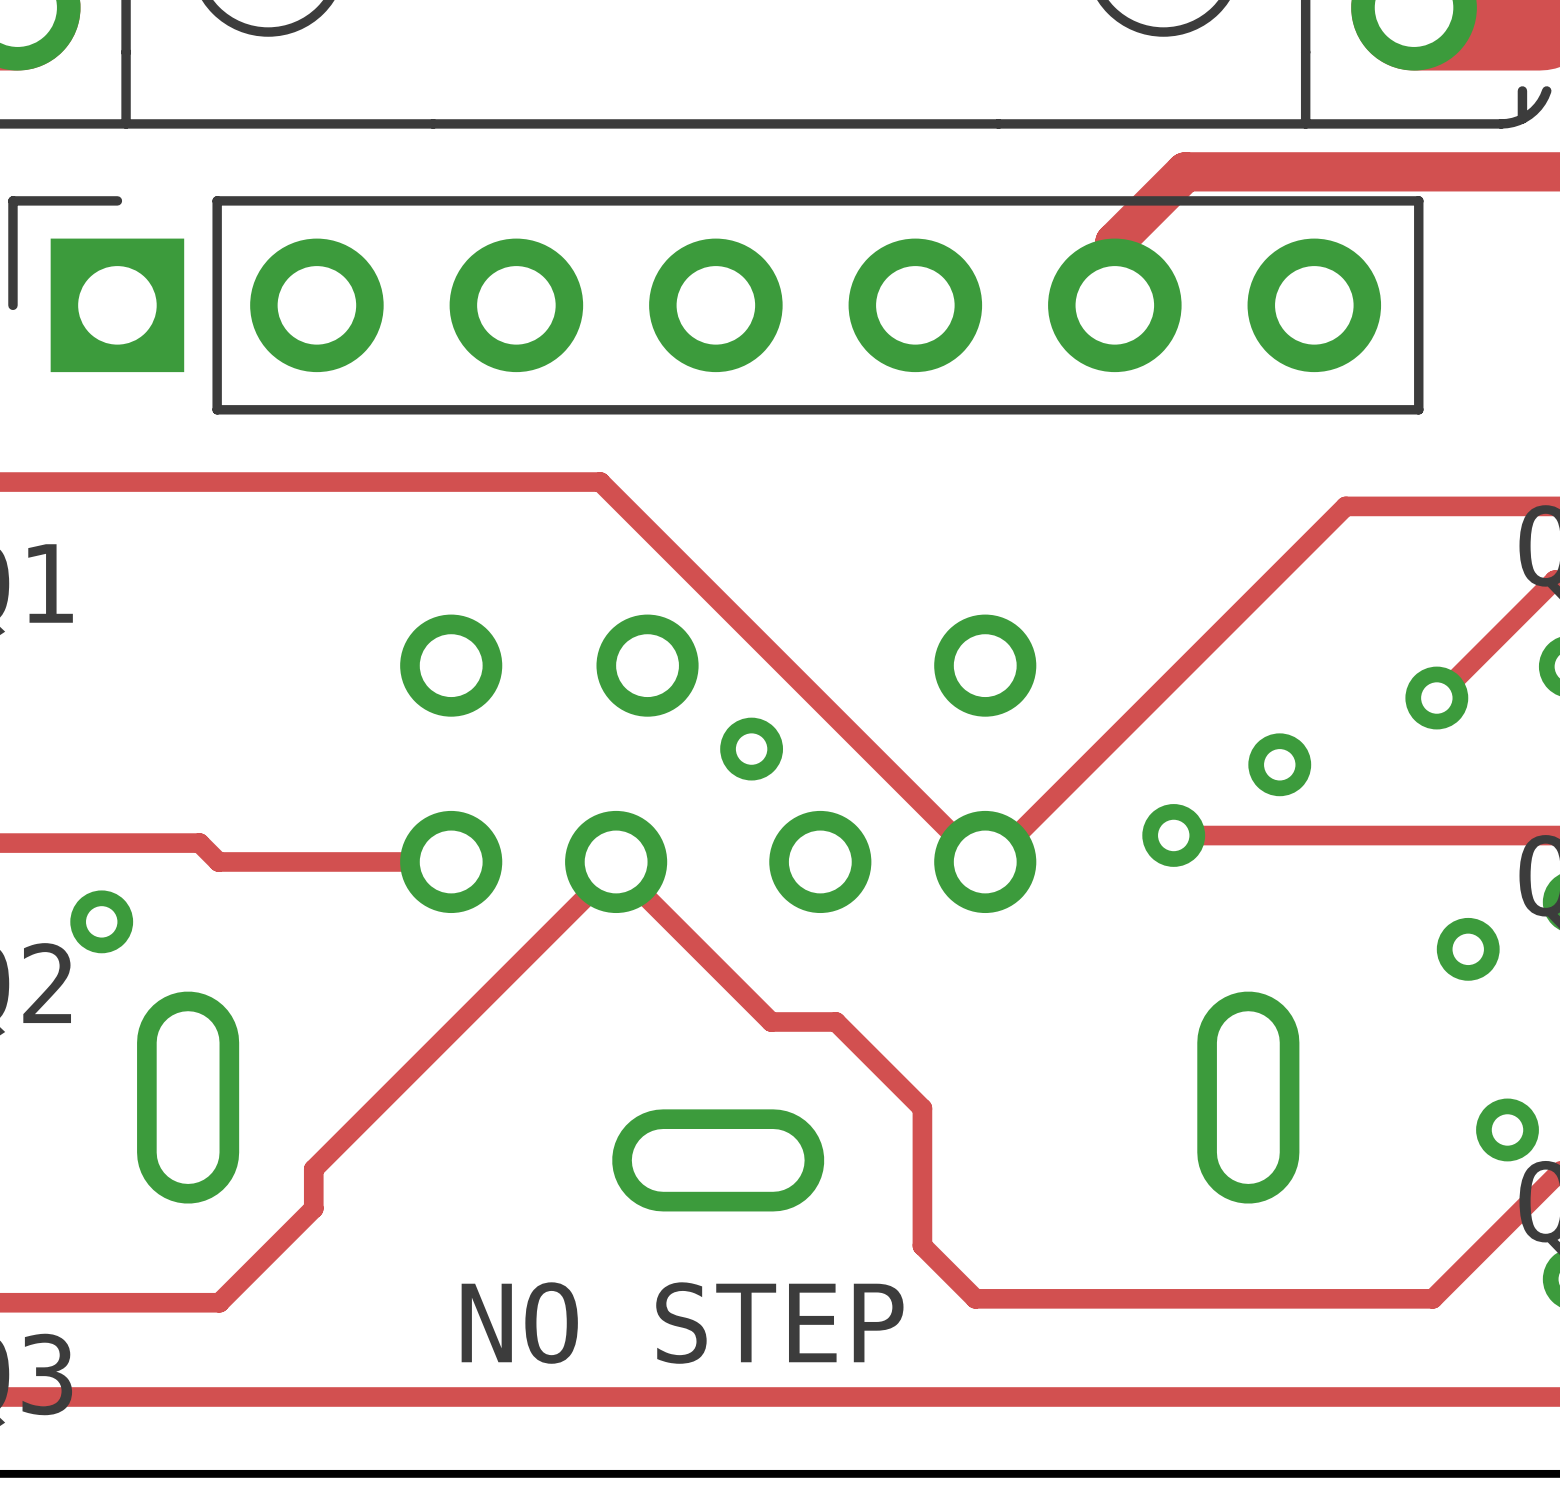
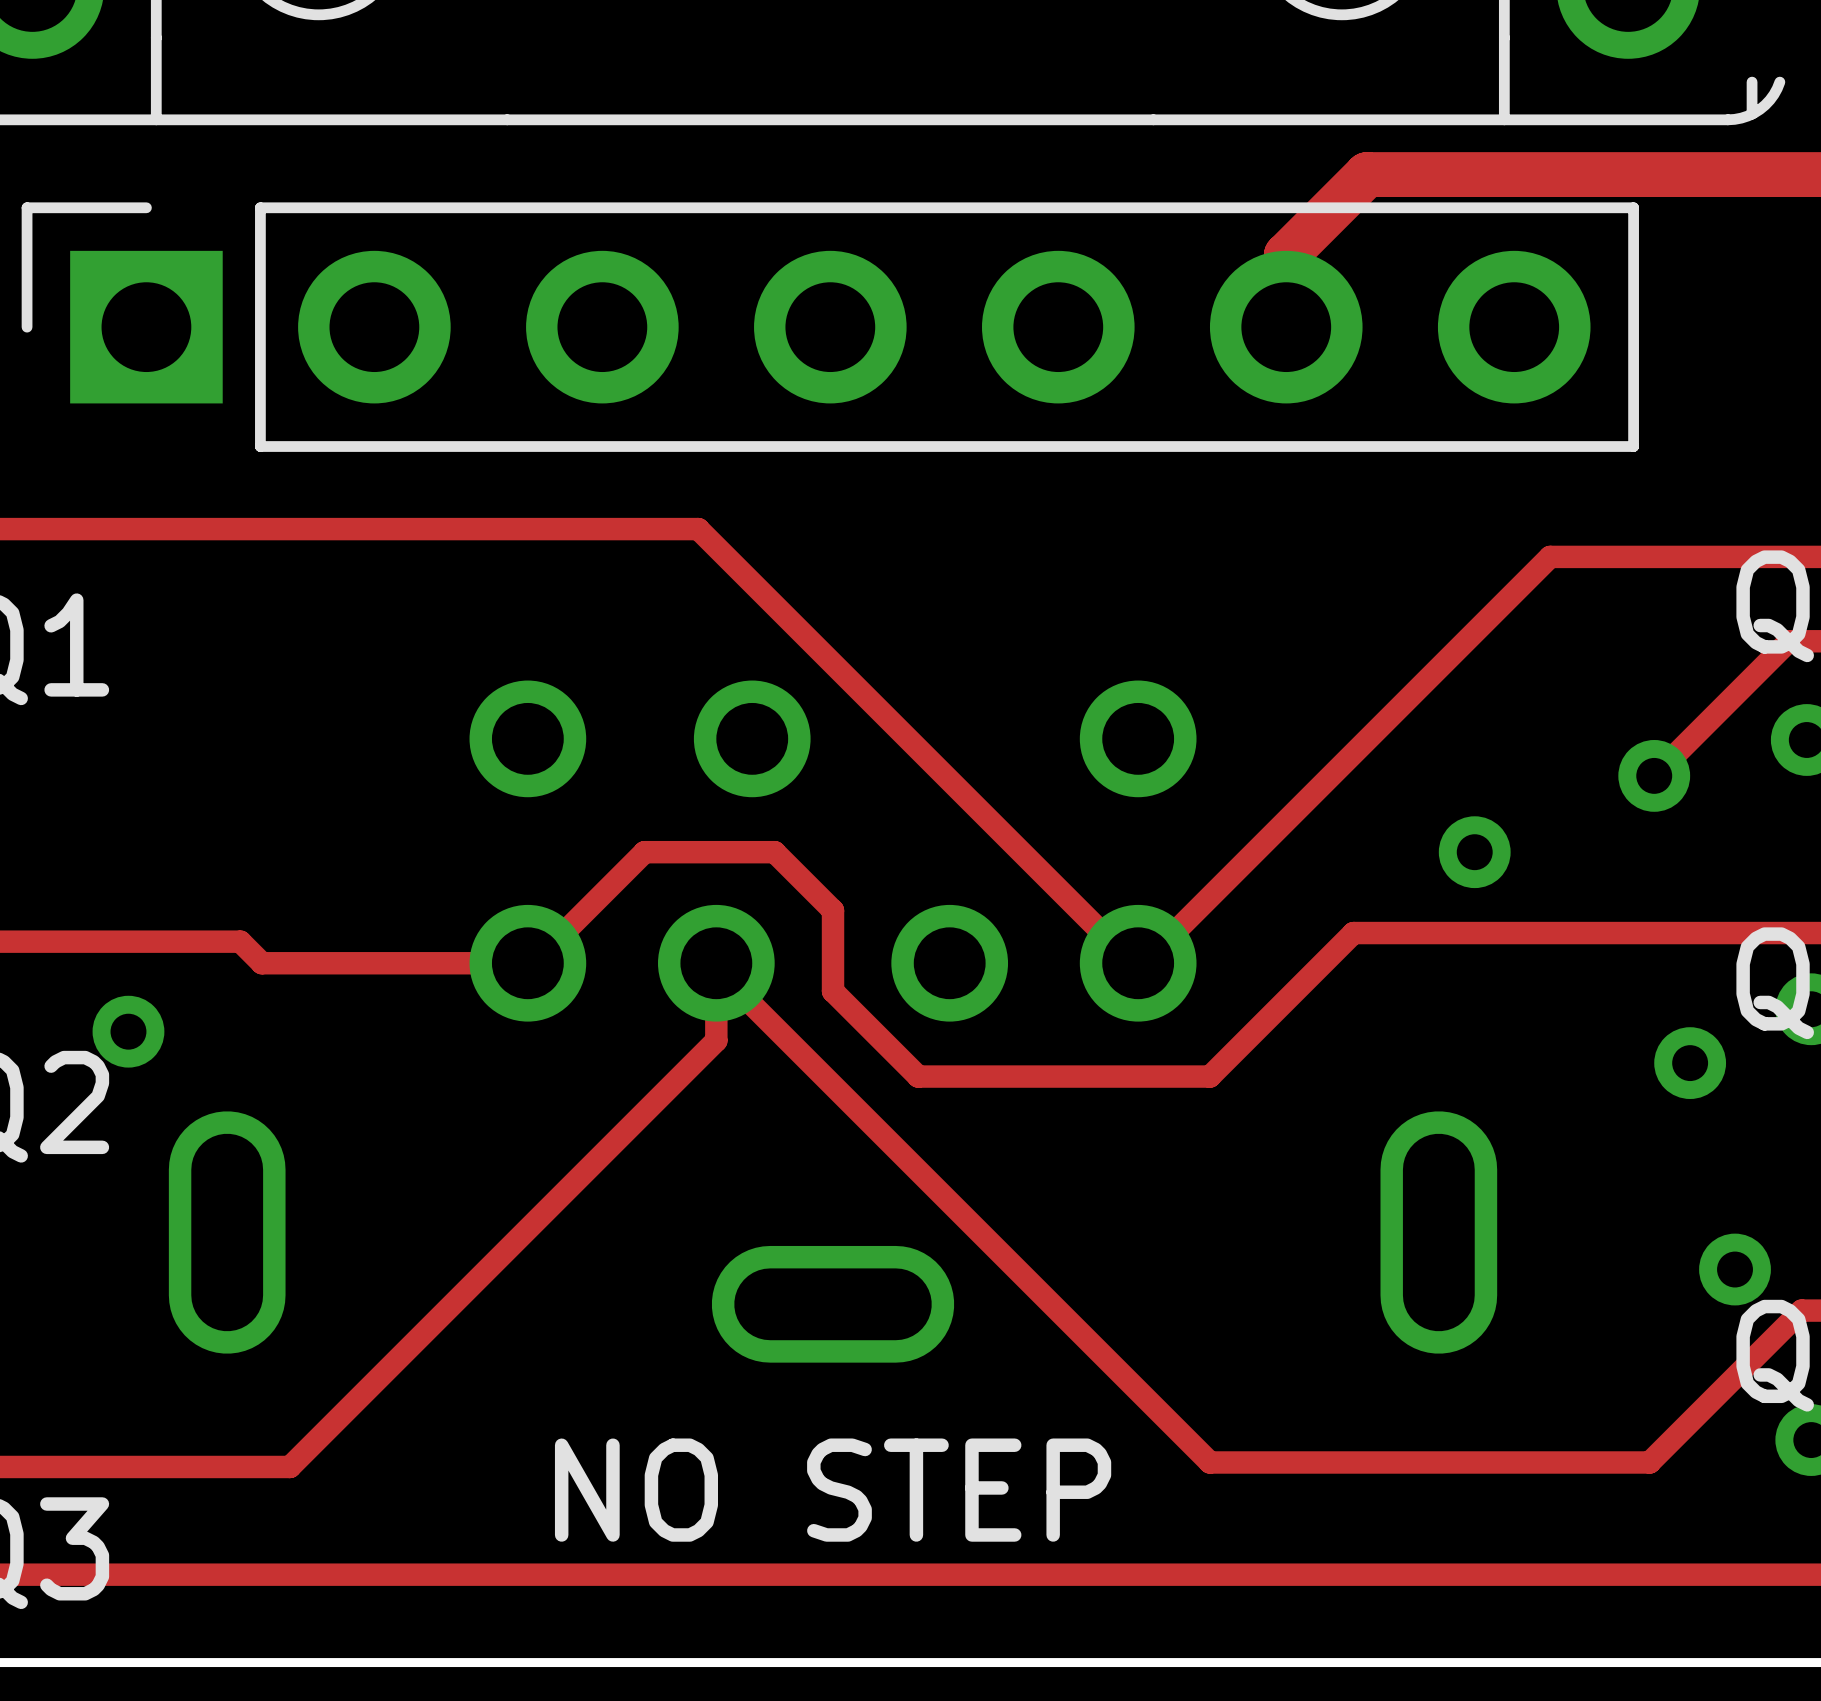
via: (751, 749) -> none
track: none -> (1353, 933) (1209, 1076) (918, 1076) (833, 991) (833, 910) (774, 852) (644, 852) (527, 968)
via: (1173, 835) -> none
track: (616, 866) (313, 1169) (313, 1208) (219, 1302) -> (716, 968) (716, 1040) (290, 1466) (263, 1466)
track: (771, 1021) (836, 1021) (922, 1108) (922, 1245) (975, 1298) (1048, 1298) -> (893, 1146) (1209, 1462)

